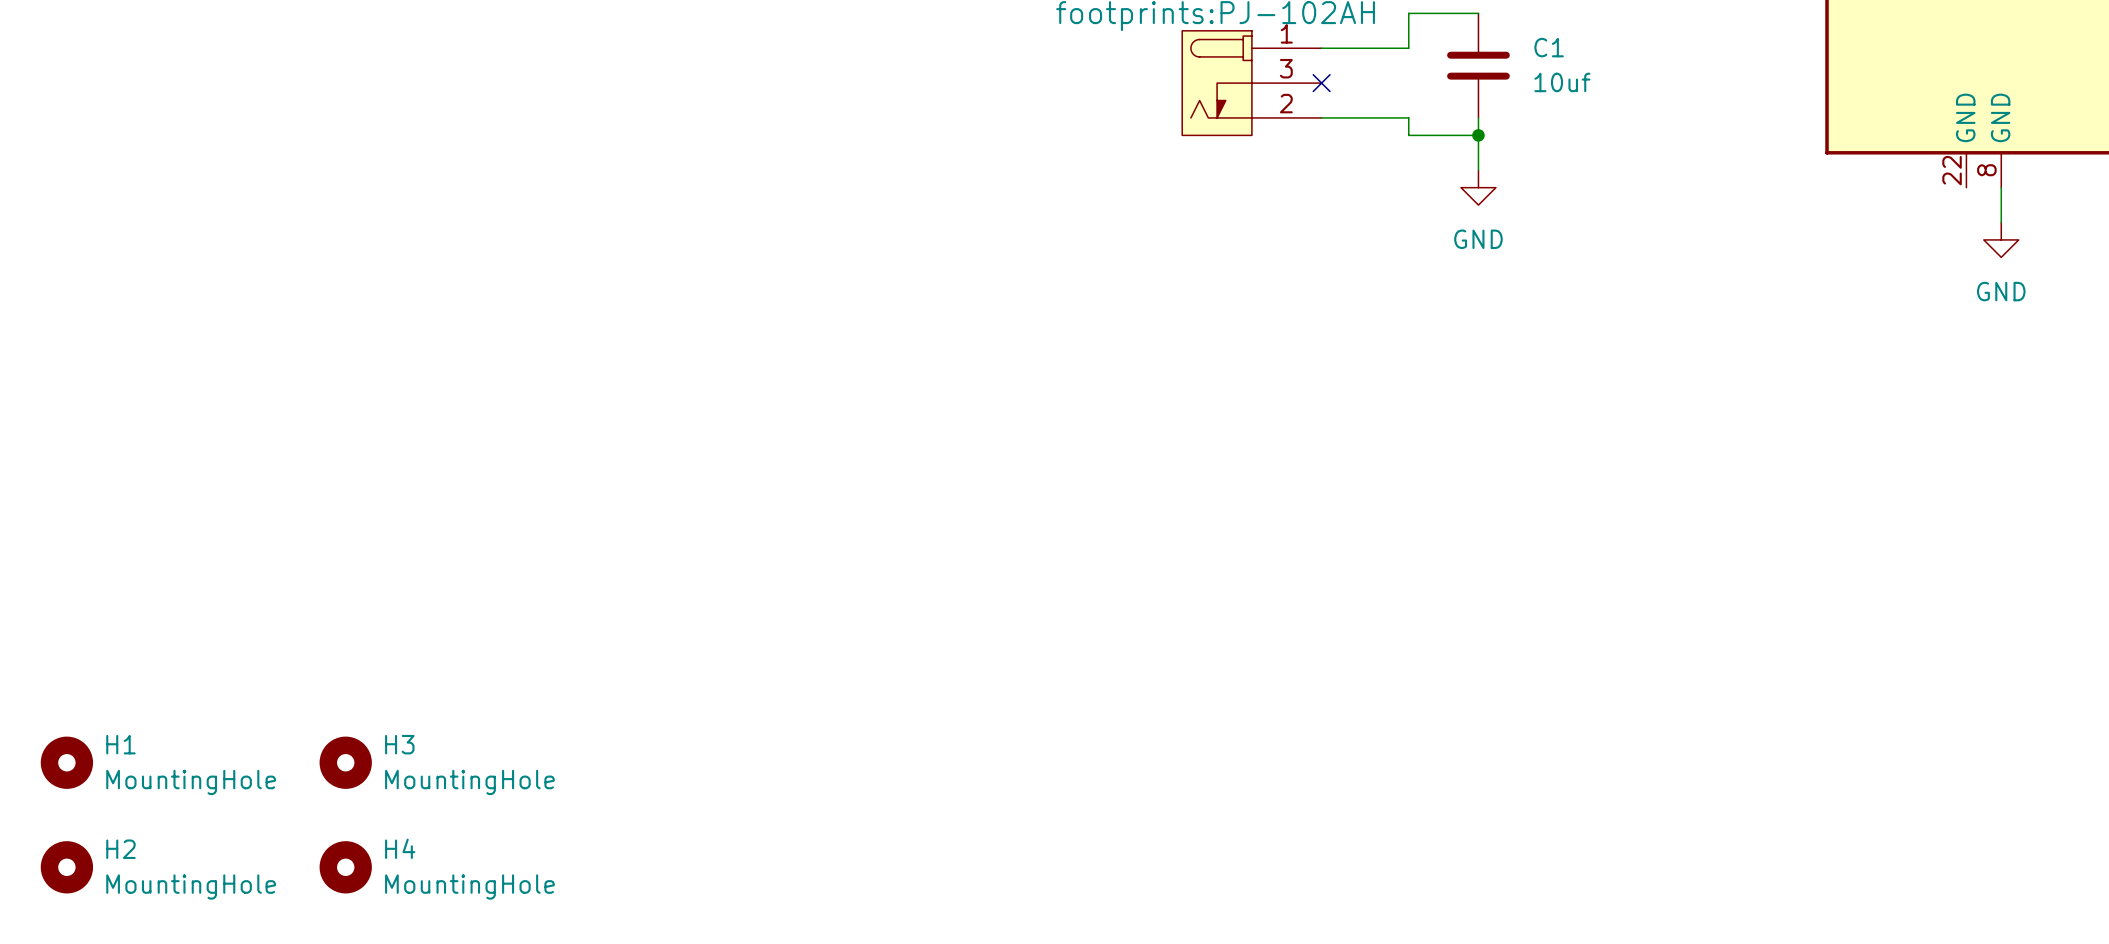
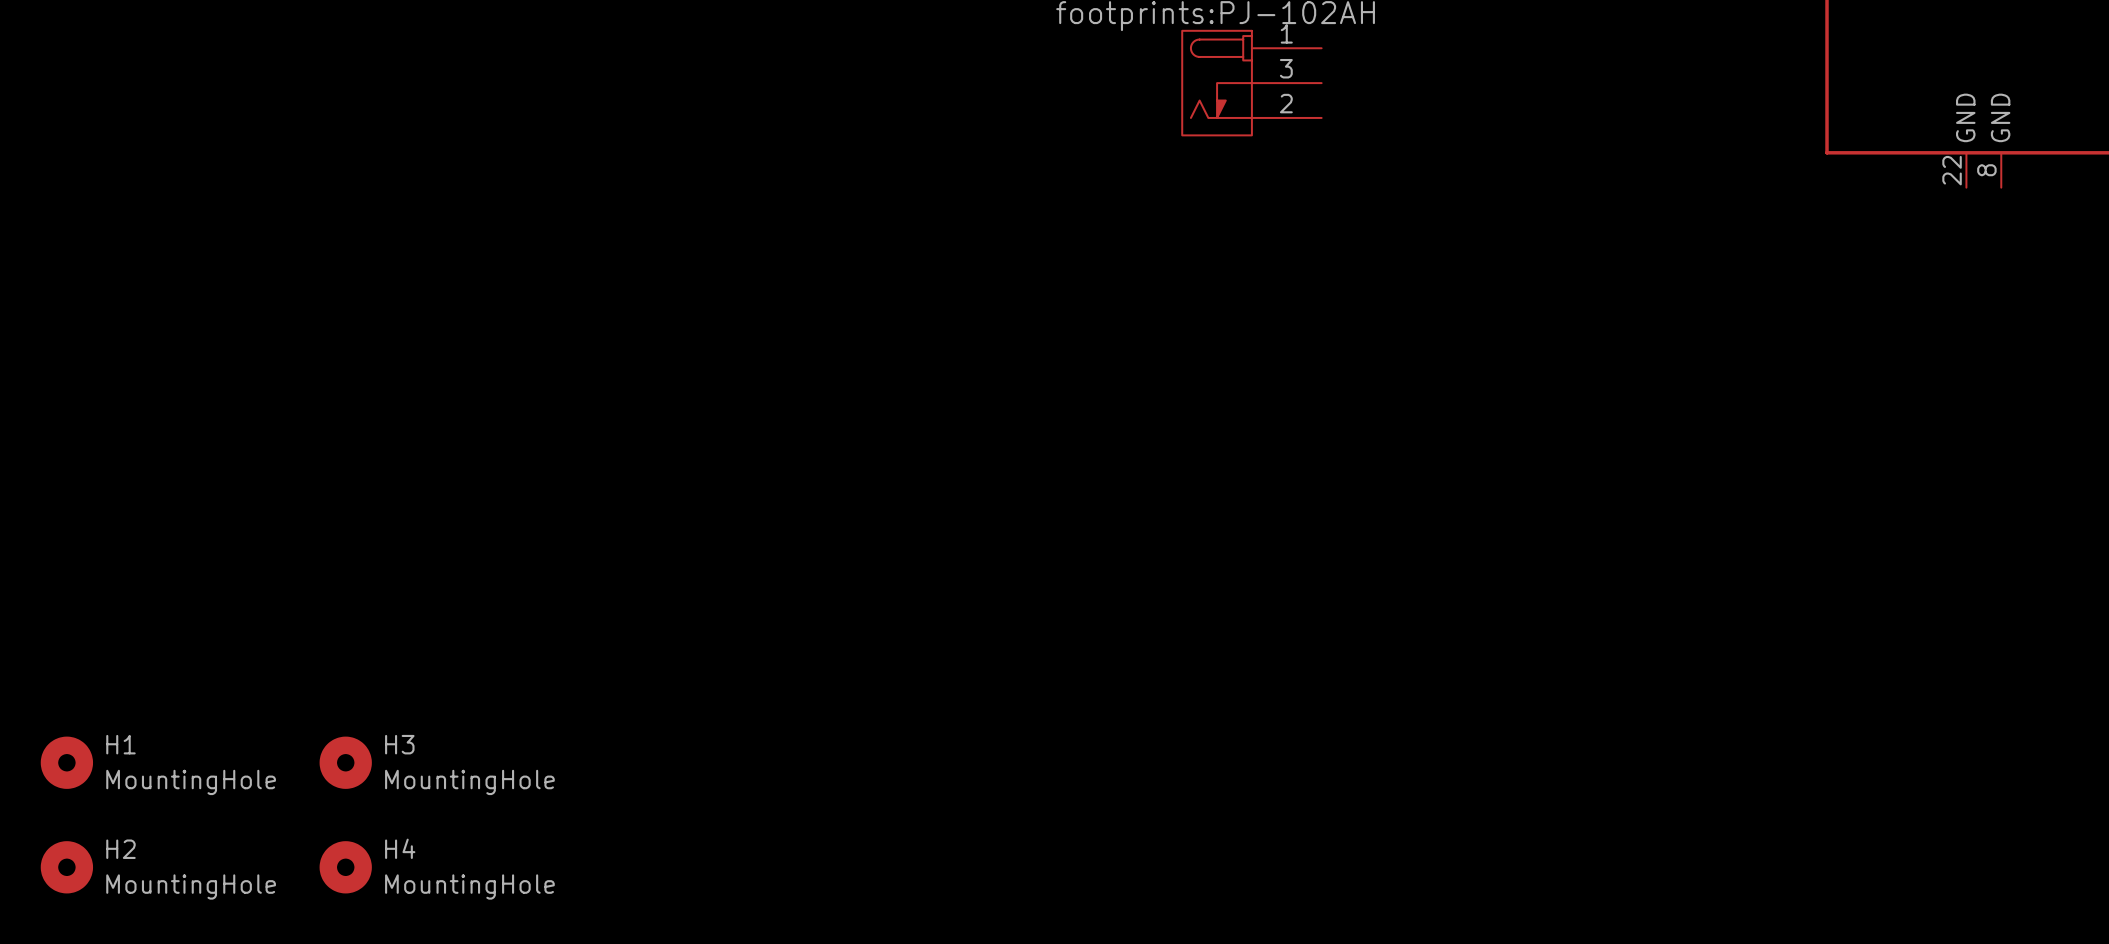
wire: (1478, 13) (1408, 13) (1408, 48) (1321, 48) -> none
C1: 10uf (1478, 65) -> none
no-connect mark: (1321, 83) -> none
wire: (1321, 117) (1408, 117) (1408, 135) (1478, 135) -> none
wire: (1478, 117) (1478, 170) -> none
junction: (1478, 135) -> none
power symbol: GND (1478, 187) -> none
wire: (2001, 187) (2001, 222) -> none
power symbol: GND (2001, 239) -> none

